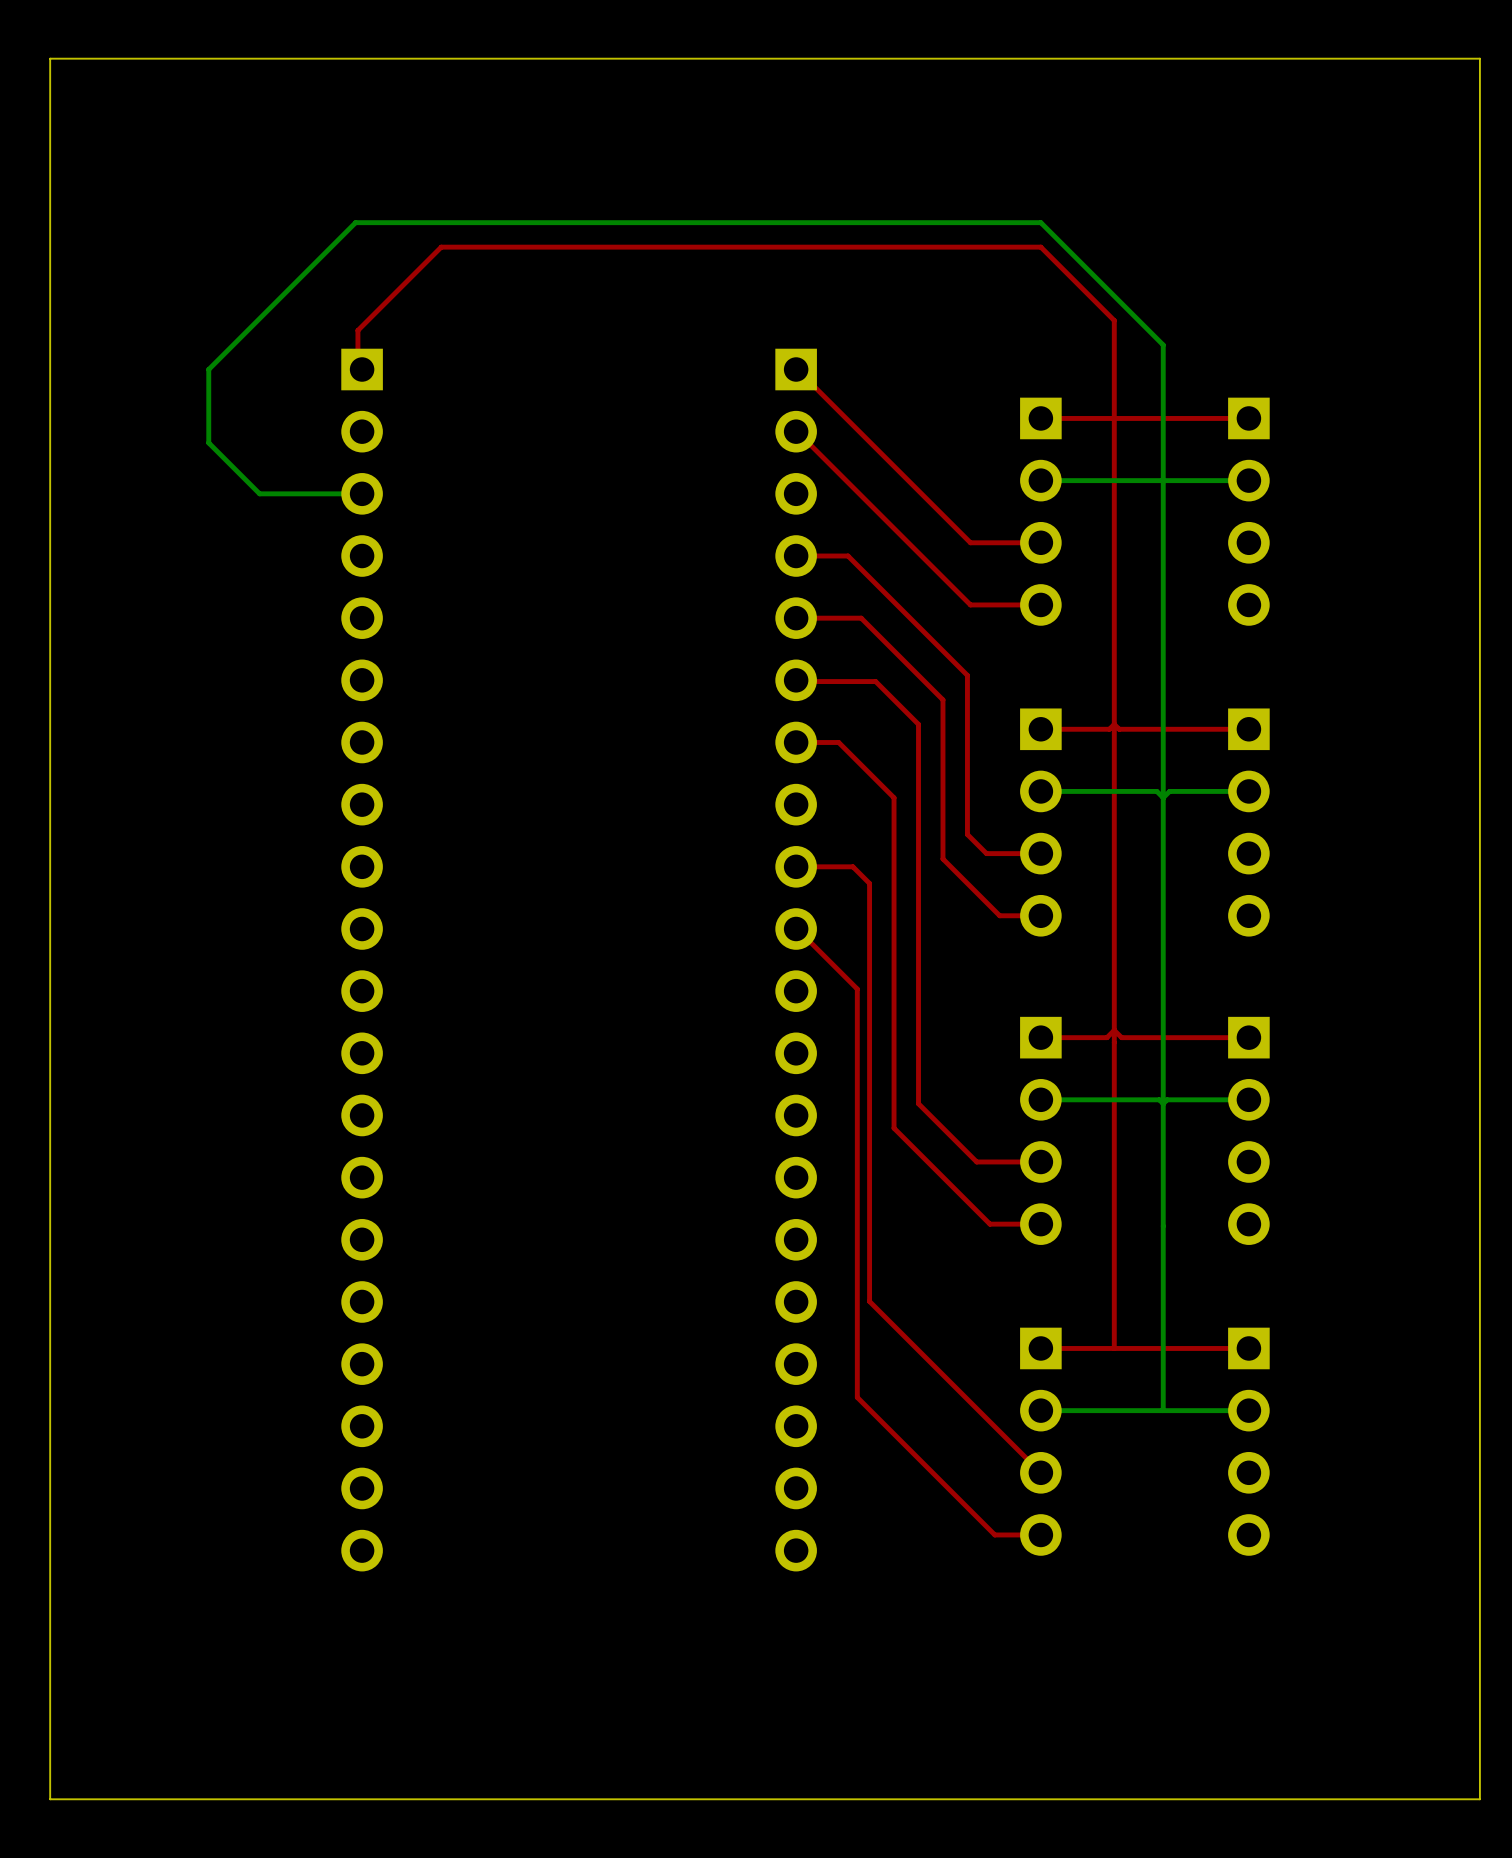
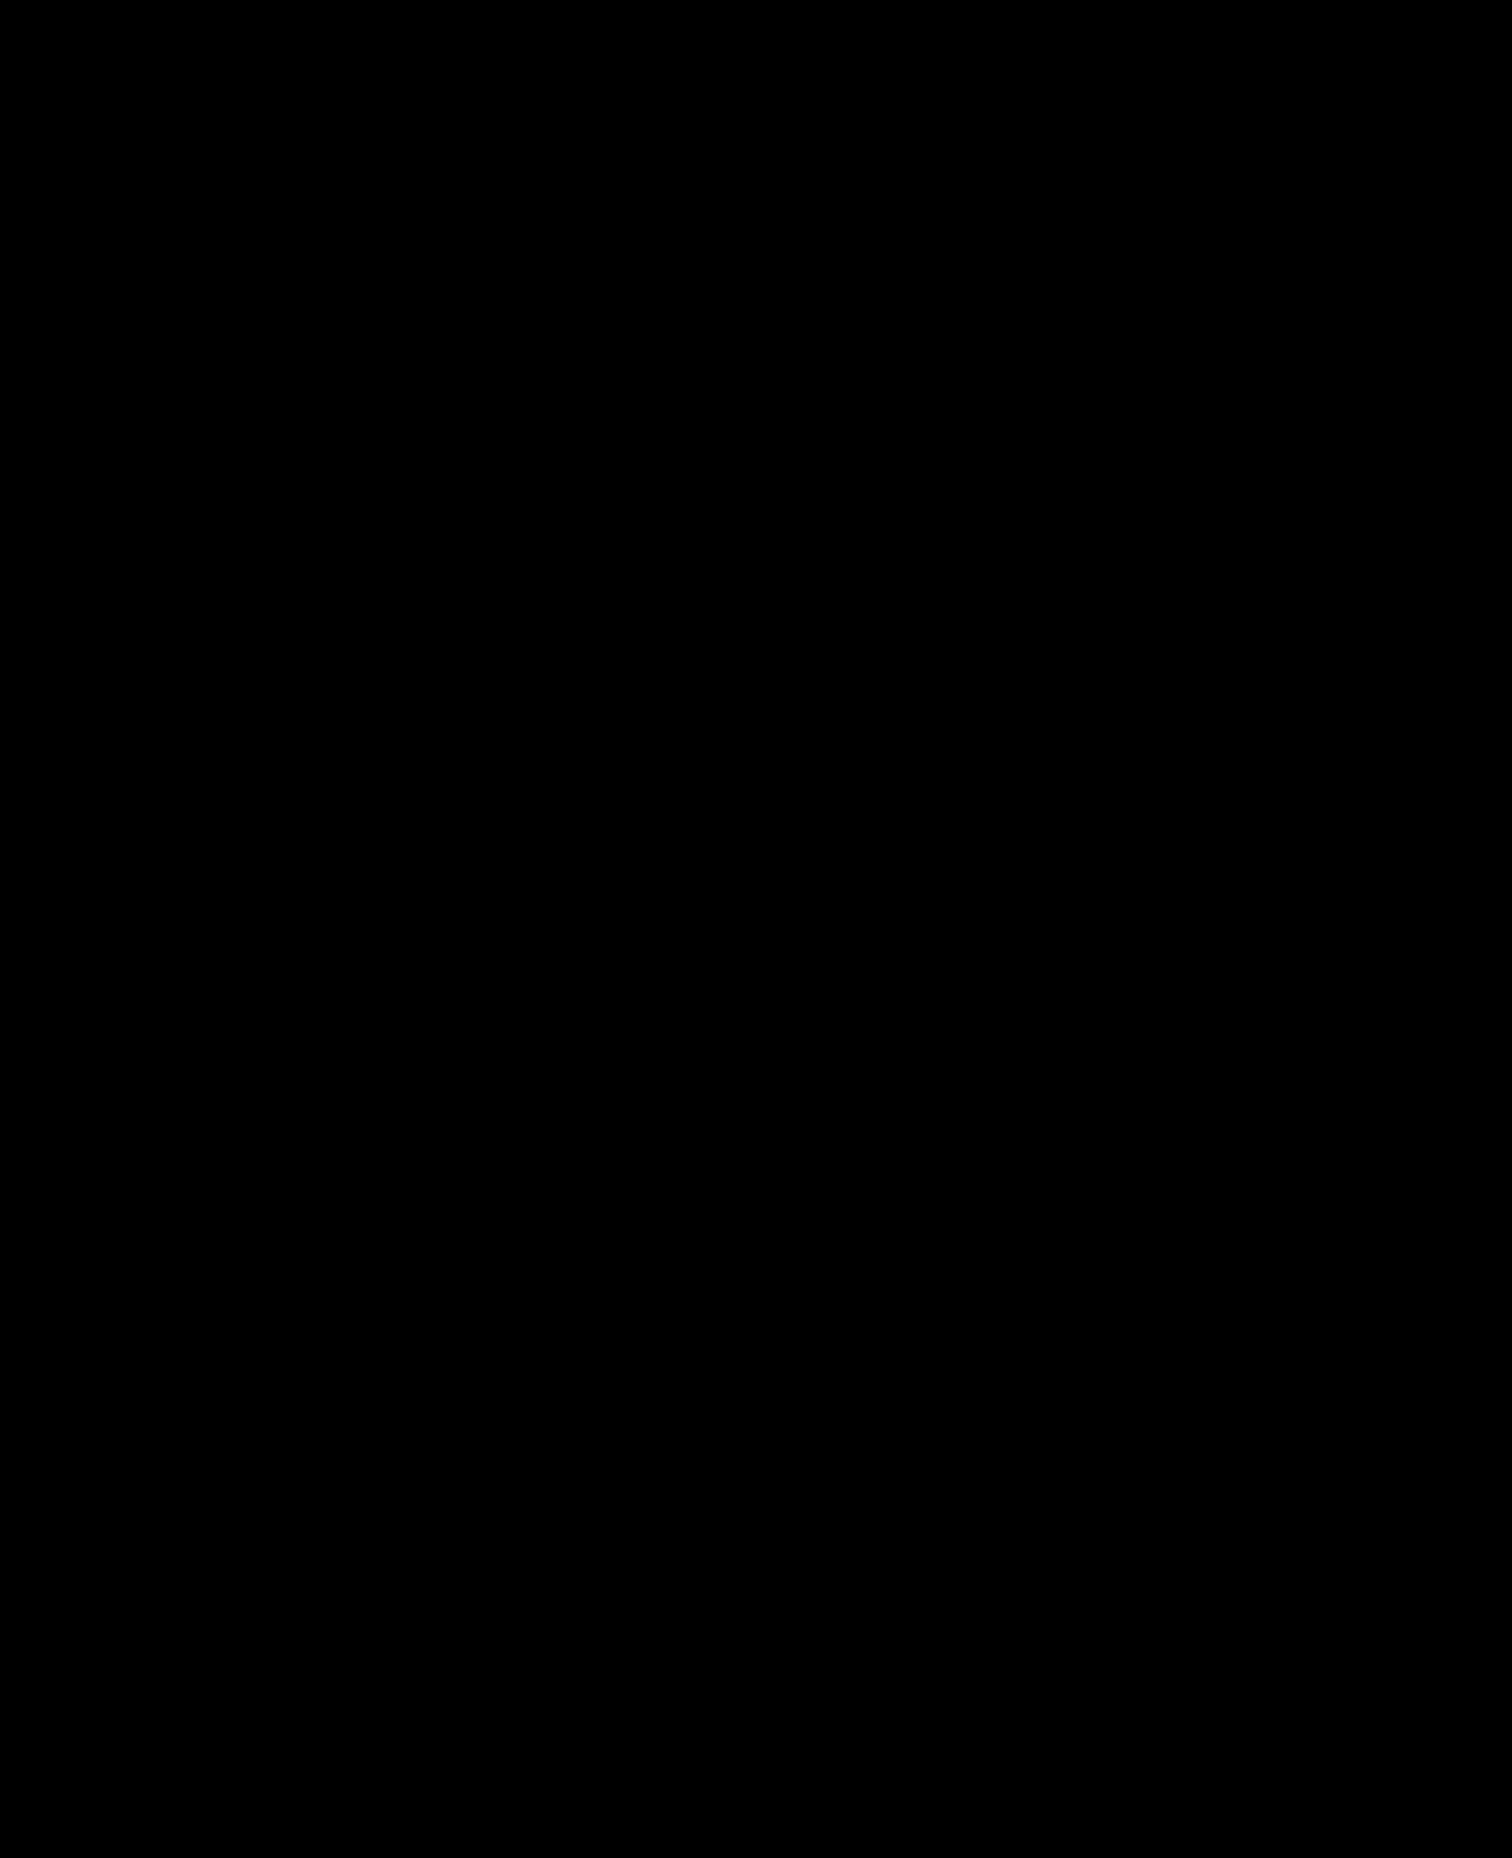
board edge: (1479, 58) (50, 58) (50, 1799) (1479, 1799) (1479, 58) -> none
top track: (362, 369) (357, 365) (357, 330) (441, 247) (1040, 247) (1114, 320) (1114, 1348) -> none
top track: (796, 369) (970, 542) (1040, 542) -> none
top track: (1248, 418) (1040, 418) -> none
top track: (796, 431) (970, 604) (1040, 604) -> none
bottom track: (1248, 480) (1040, 480) -> none
bottom track: (362, 493) (259, 493) (208, 442) (208, 369) (355, 222) (1040, 222) (1163, 345) (1162, 1410) -> none
part: (1040, 511) -> none
part: (1248, 511) -> none
top track: (796, 556) (848, 556) (967, 675) (967, 834) (986, 853) (1040, 853) -> none
top track: (796, 618) (861, 618) (942, 699) (942, 858) (999, 915) (1040, 915) -> none
top track: (796, 680) (875, 681) (918, 724) (918, 1103) (976, 1161) (1040, 1161) -> none
top track: (1248, 729) (1119, 729) (1114, 724) (1109, 729) (1040, 729) -> none
top track: (796, 742) (838, 742) (894, 797) (894, 1128) (989, 1224) (1040, 1224) -> none
bottom track: (1248, 791) (1169, 791) (1163, 797) (1156, 791) (1040, 791) -> none
part: (1040, 822) -> none
part: (1248, 822) -> none
top track: (796, 866) (852, 866) (869, 883) (869, 1301) (1040, 1472) -> none
top track: (796, 928) (857, 989) (857, 1397) (994, 1534) (1040, 1534) -> none
part: (362, 960) -> none
part: (796, 960) -> none
top track: (1248, 1037) (1121, 1037) (1114, 1030) (1106, 1037) (1040, 1037) -> none
bottom track: (1248, 1099) (1167, 1099) (1163, 1103) (1159, 1099) (1040, 1099) -> none
part: (1040, 1130) -> none
part: (1248, 1130) -> none
top track: (1248, 1348) (1040, 1348) -> none
bottom track: (1248, 1410) (1040, 1410) -> none
part: (1040, 1441) -> none
part: (1248, 1441) -> none

